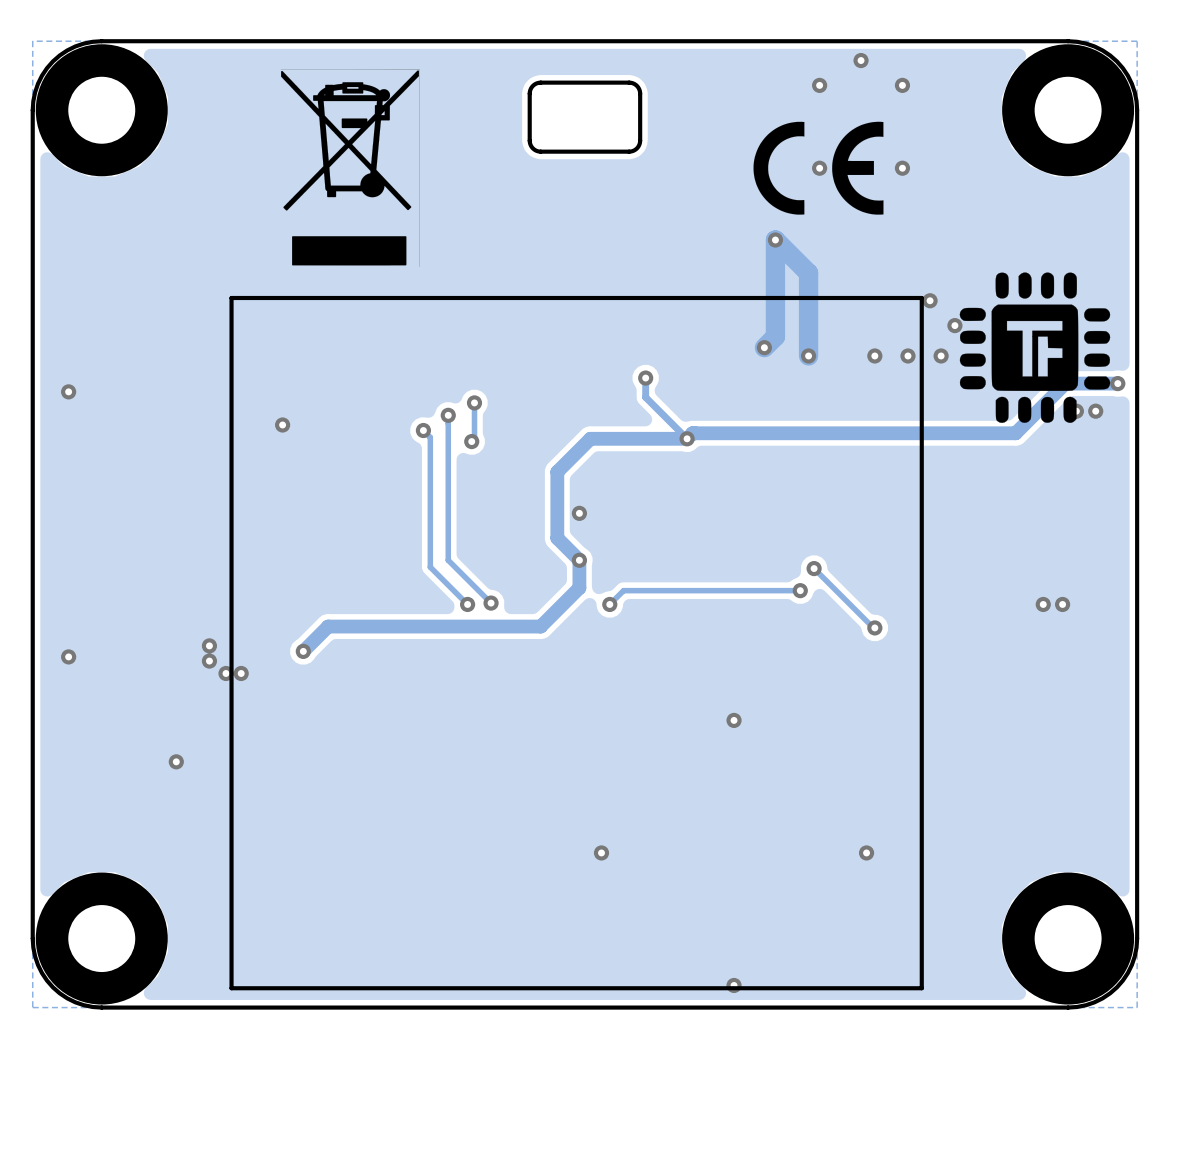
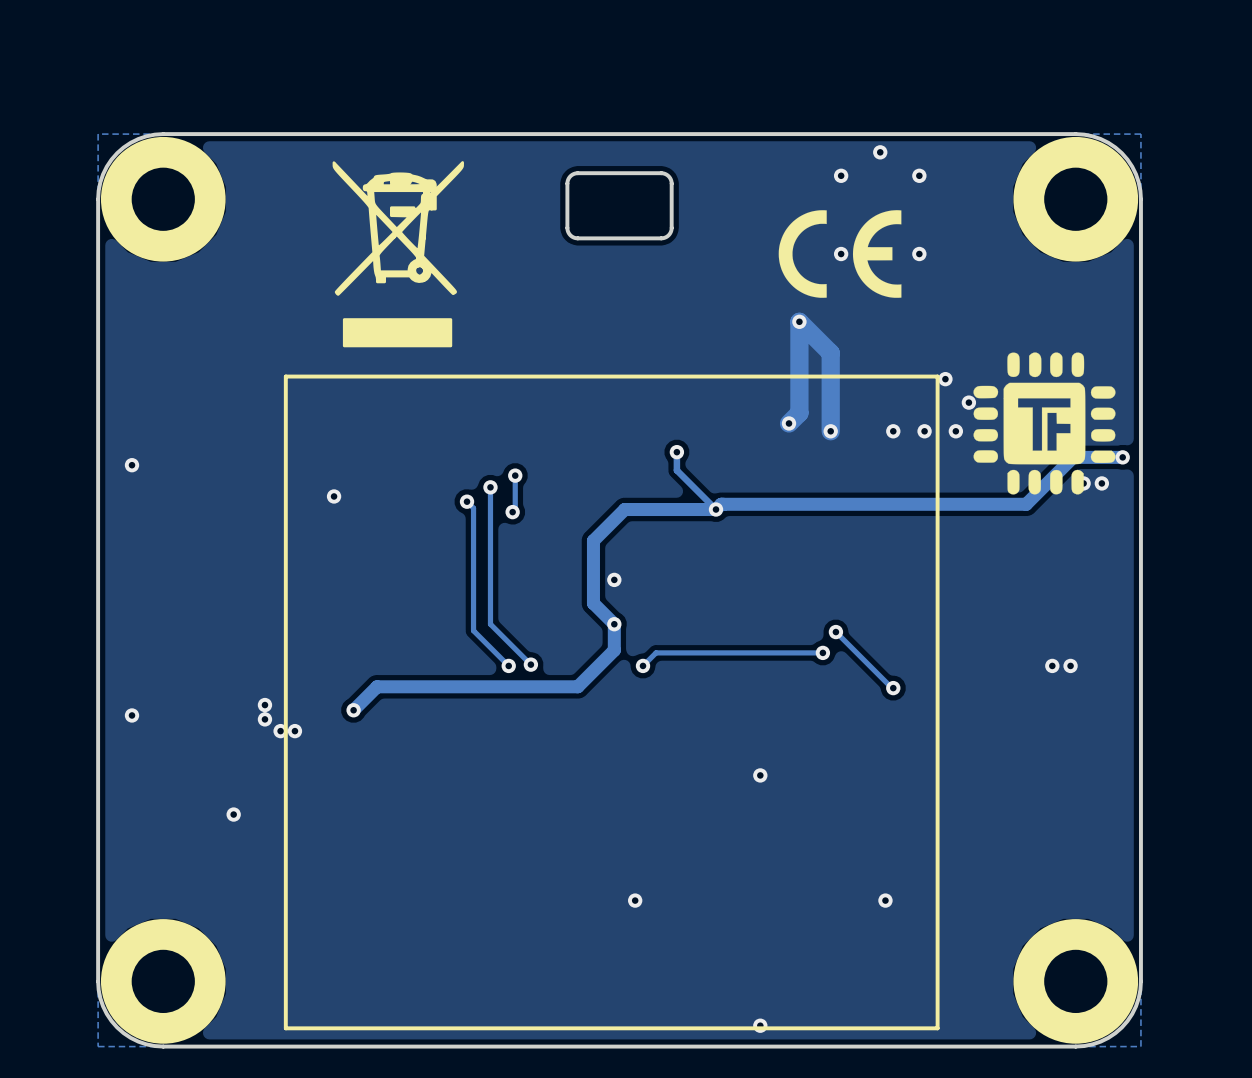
drawing shape: [280, 69, 420, 267] -> [332, 161, 464, 348]

